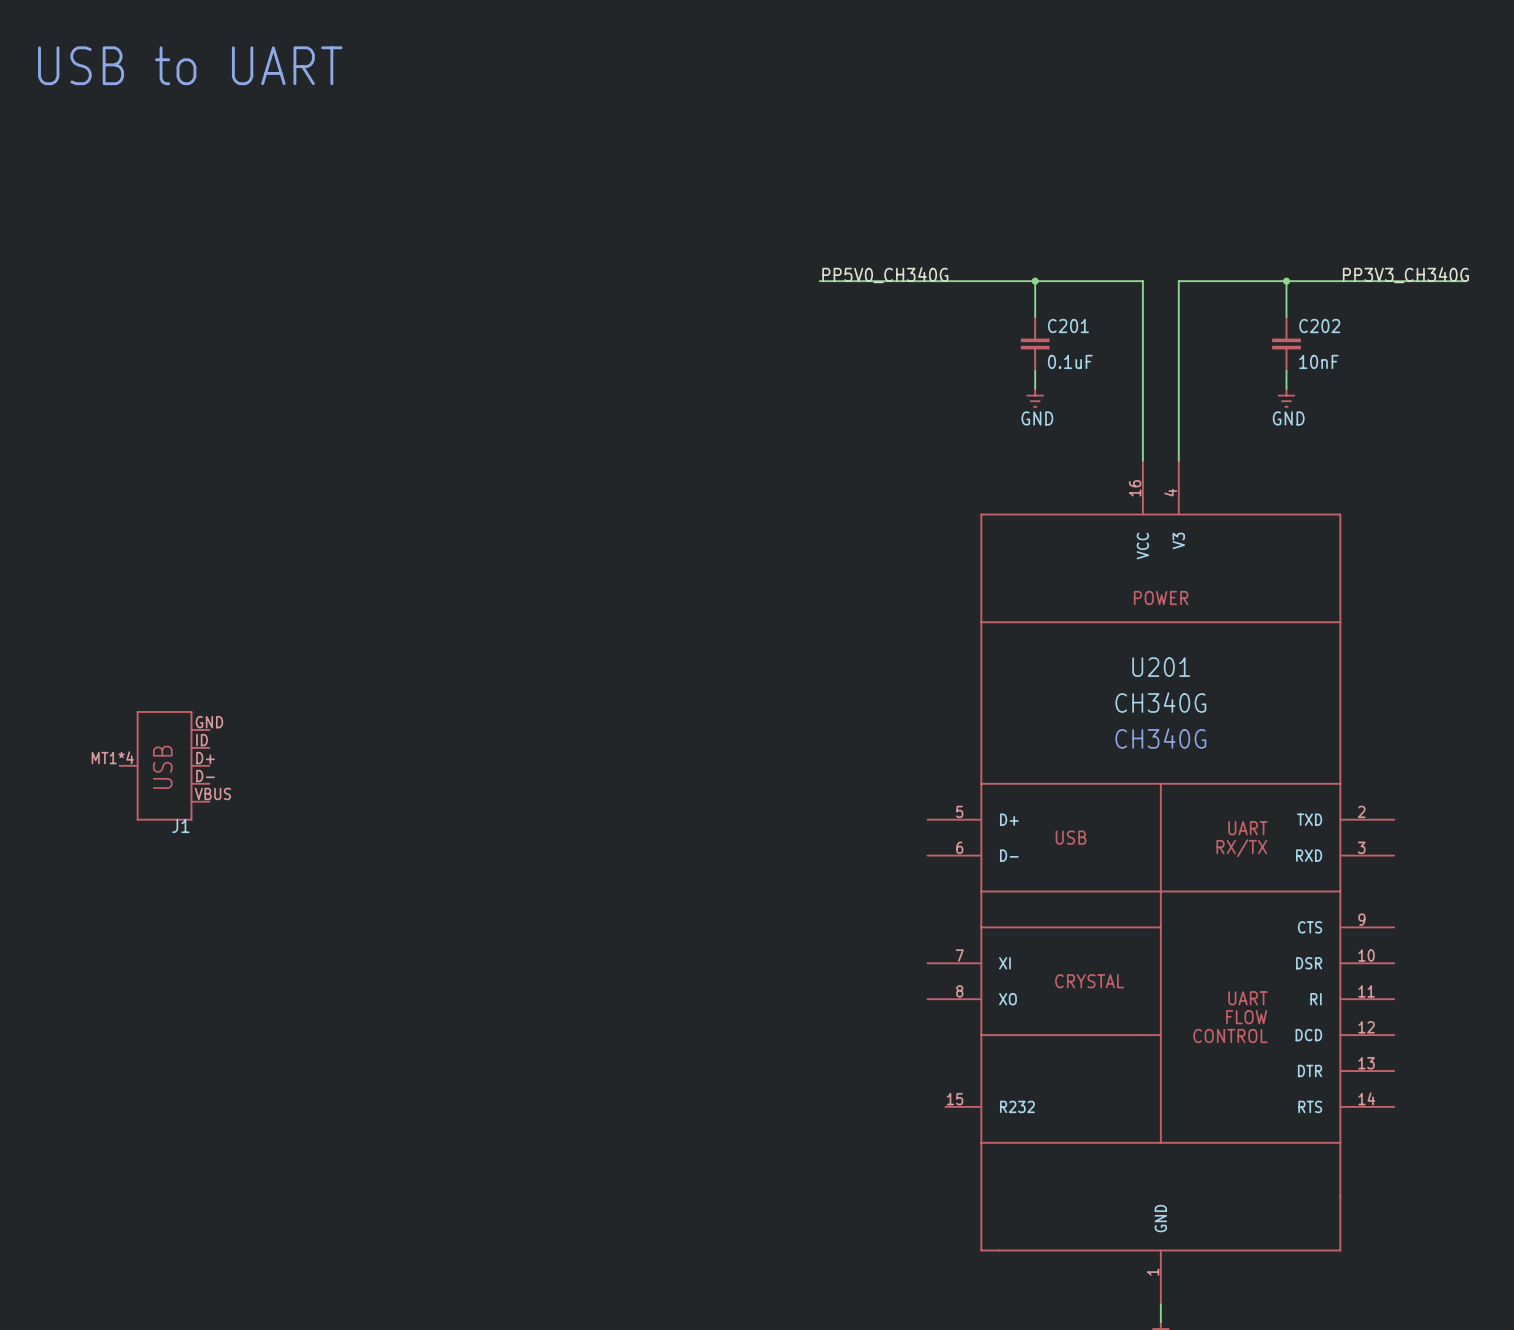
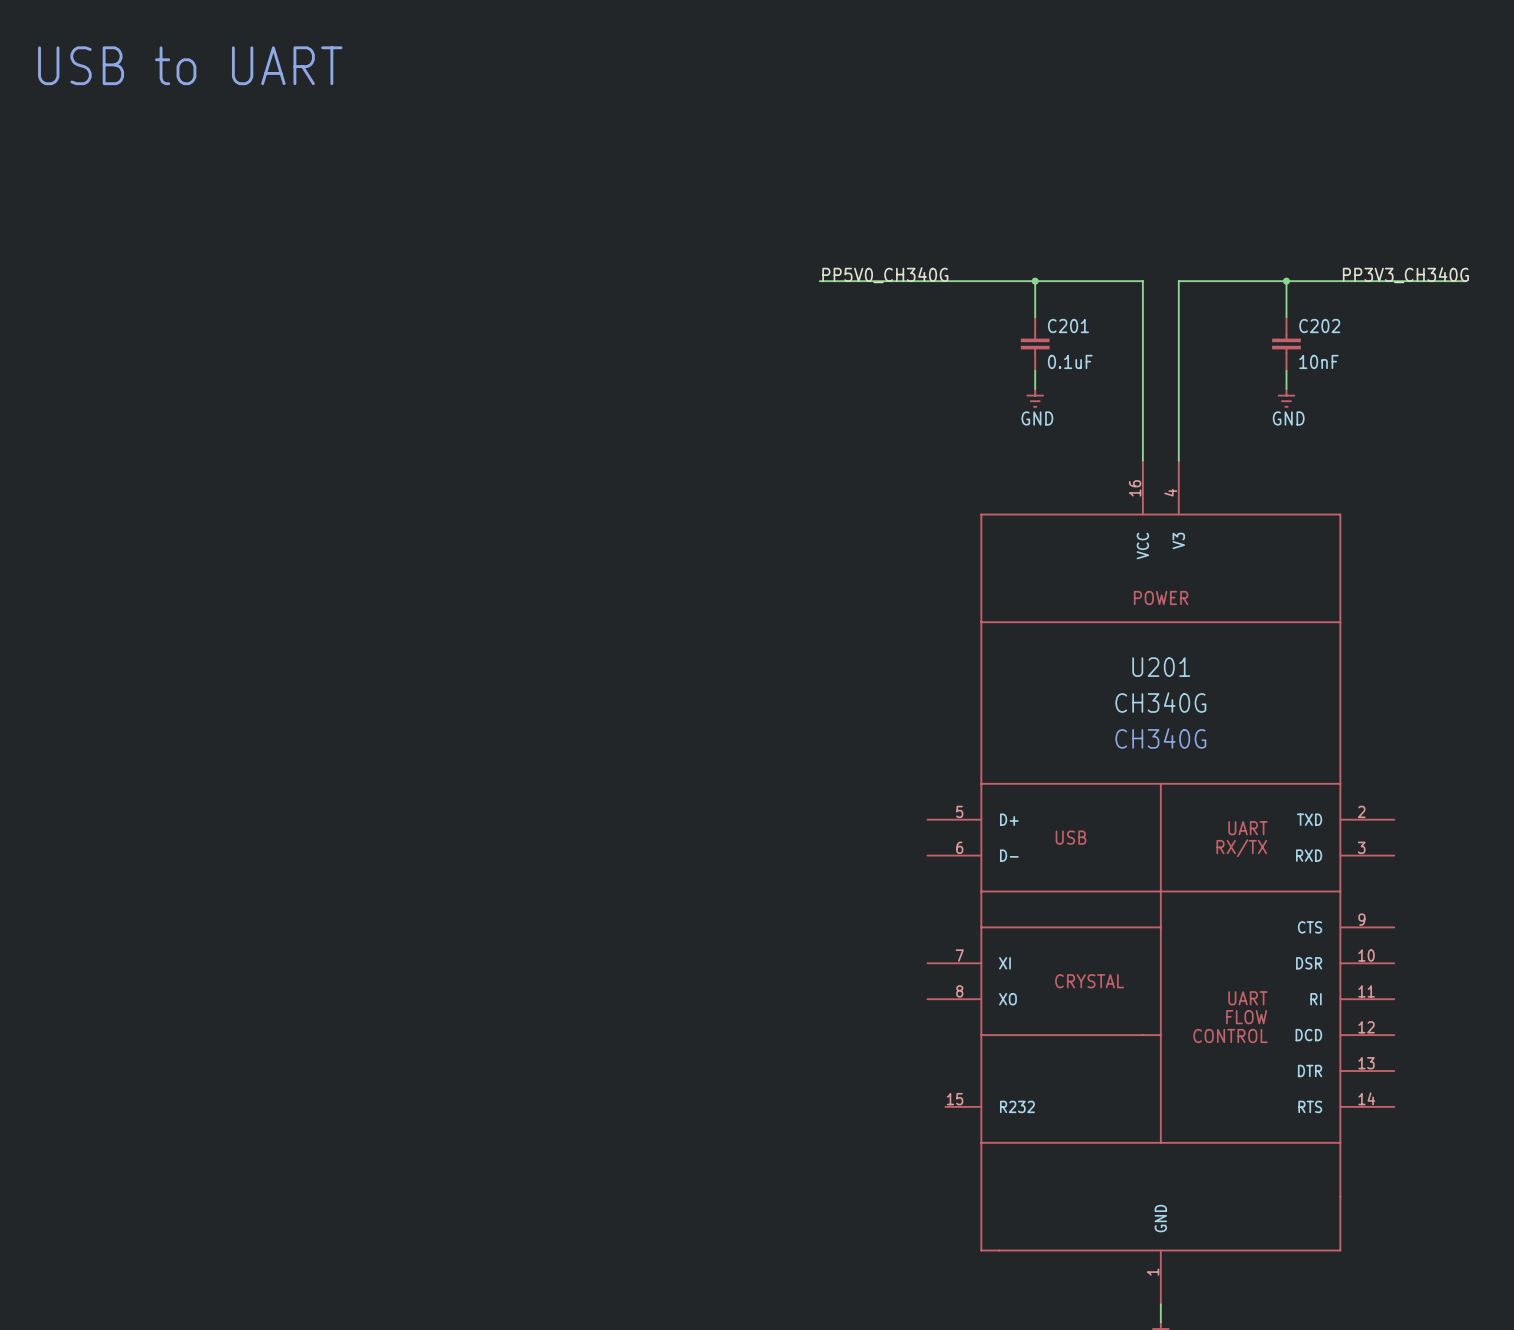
J1: (164, 765) -> none

